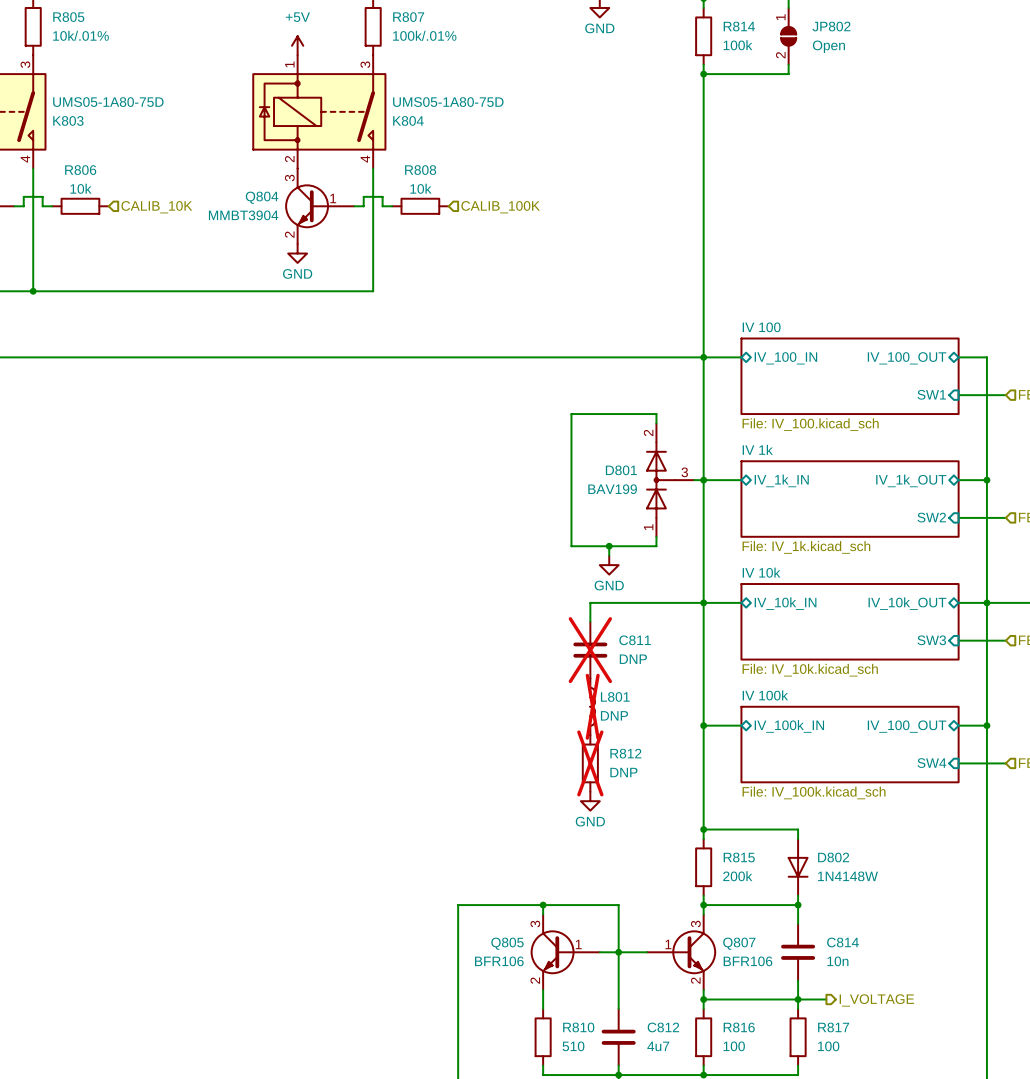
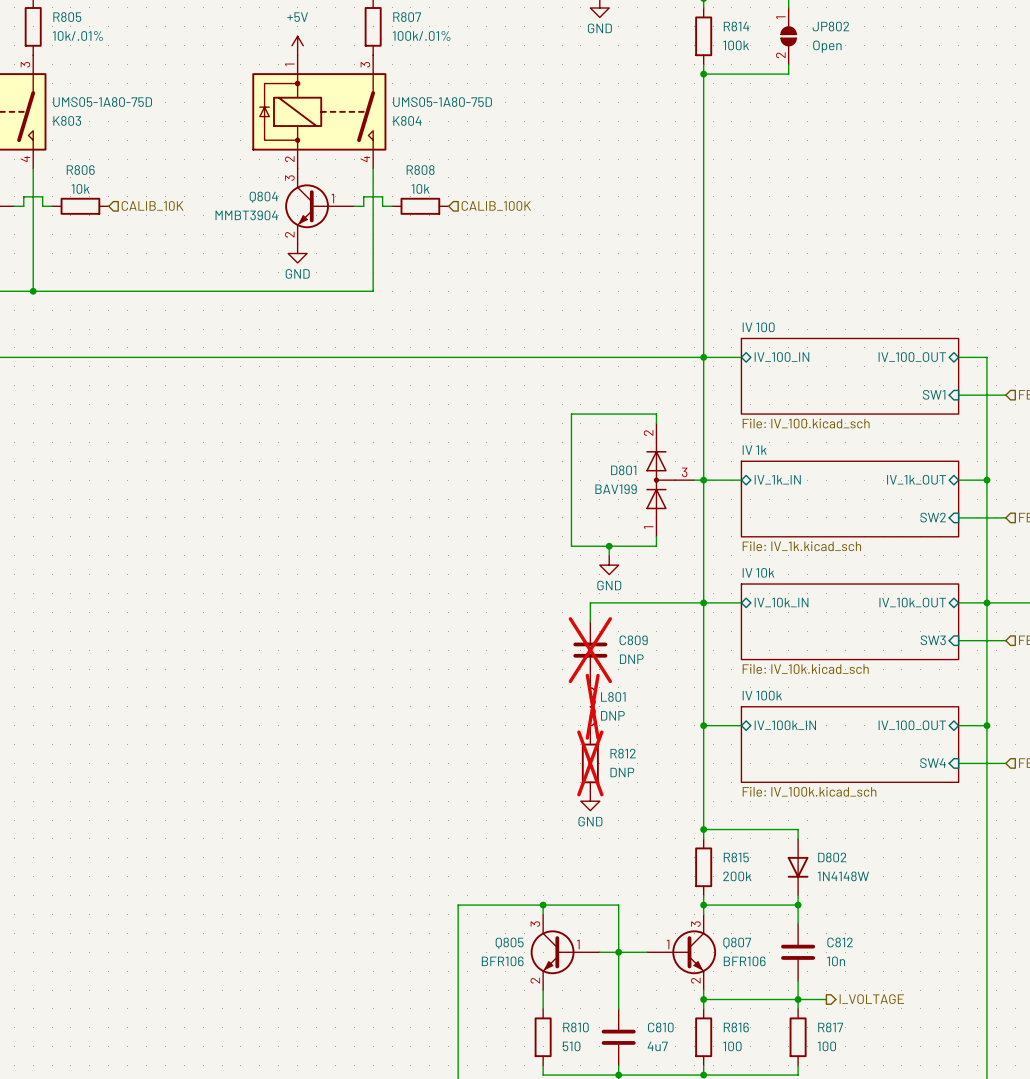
C811 name: C811 (635, 640) -> C809 (633, 640)
C814 name: C814 (842, 942) -> C812 (840, 942)
C812 name: C812 (663, 1027) -> C810 (660, 1027)

